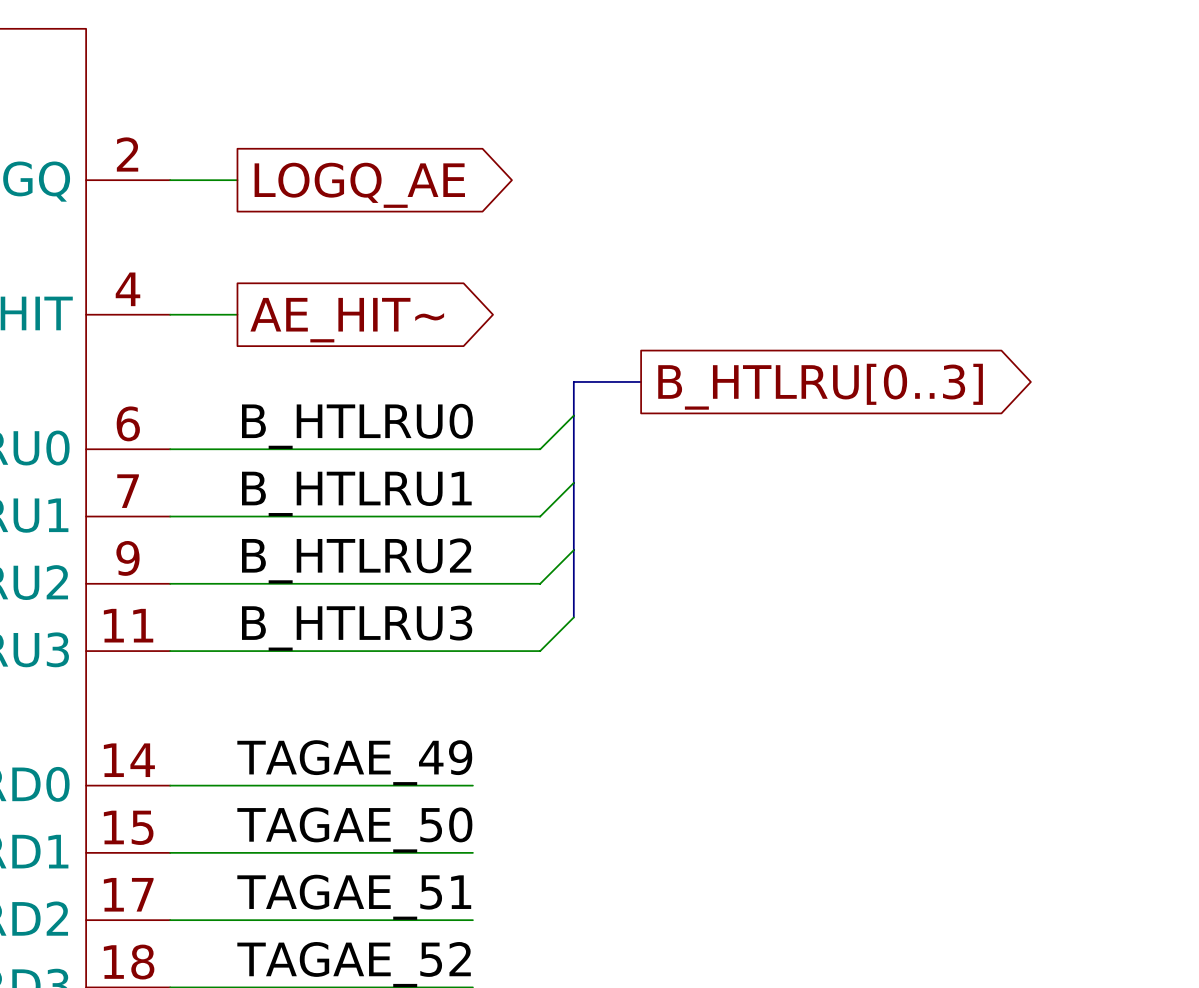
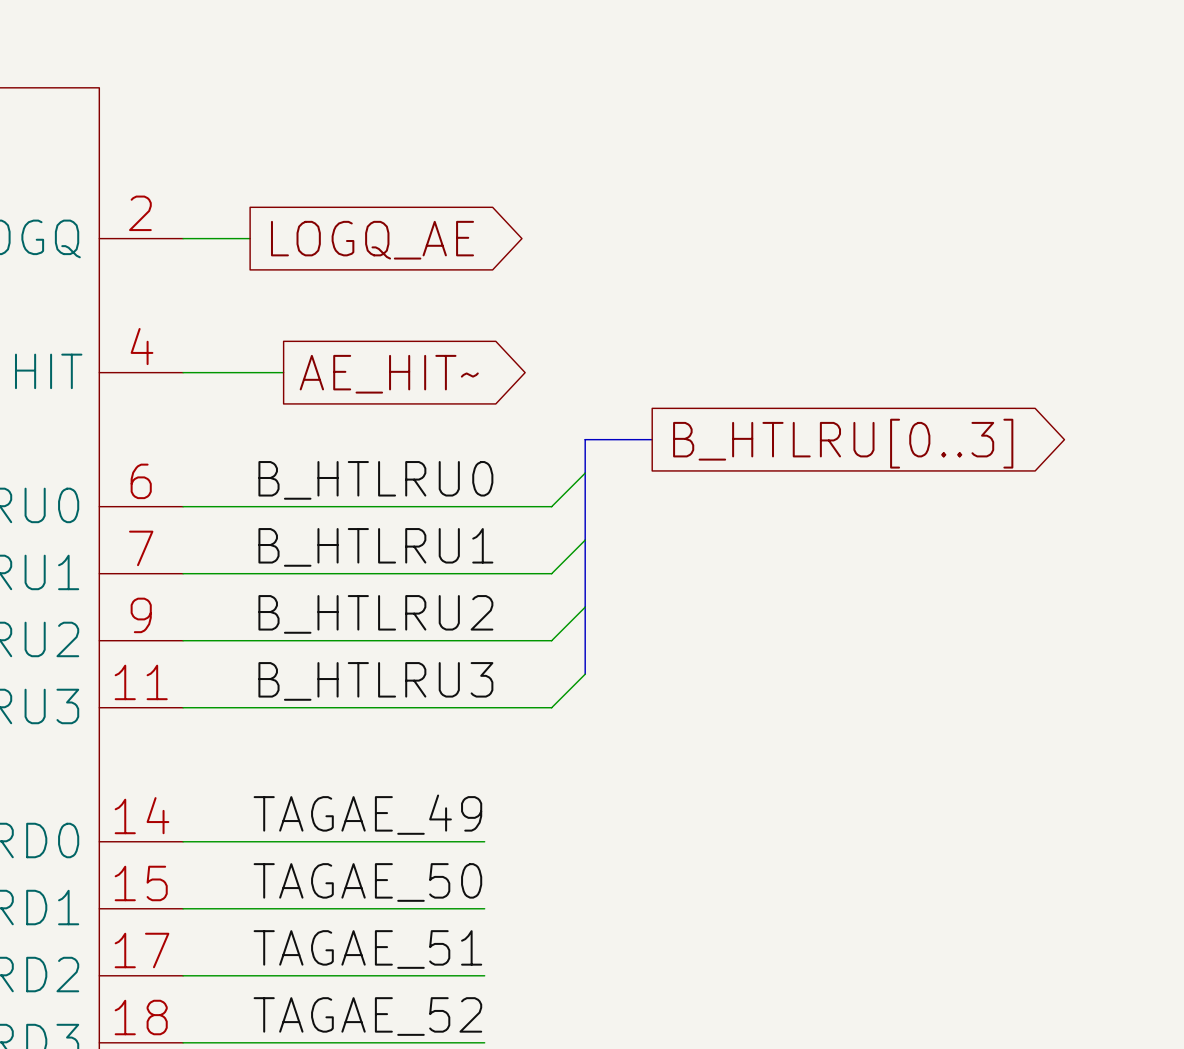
wire: none -> (250, 372) (283, 372)
global label position: AE_HIT~ (347, 320) -> AE_HIT~ (389, 374)

